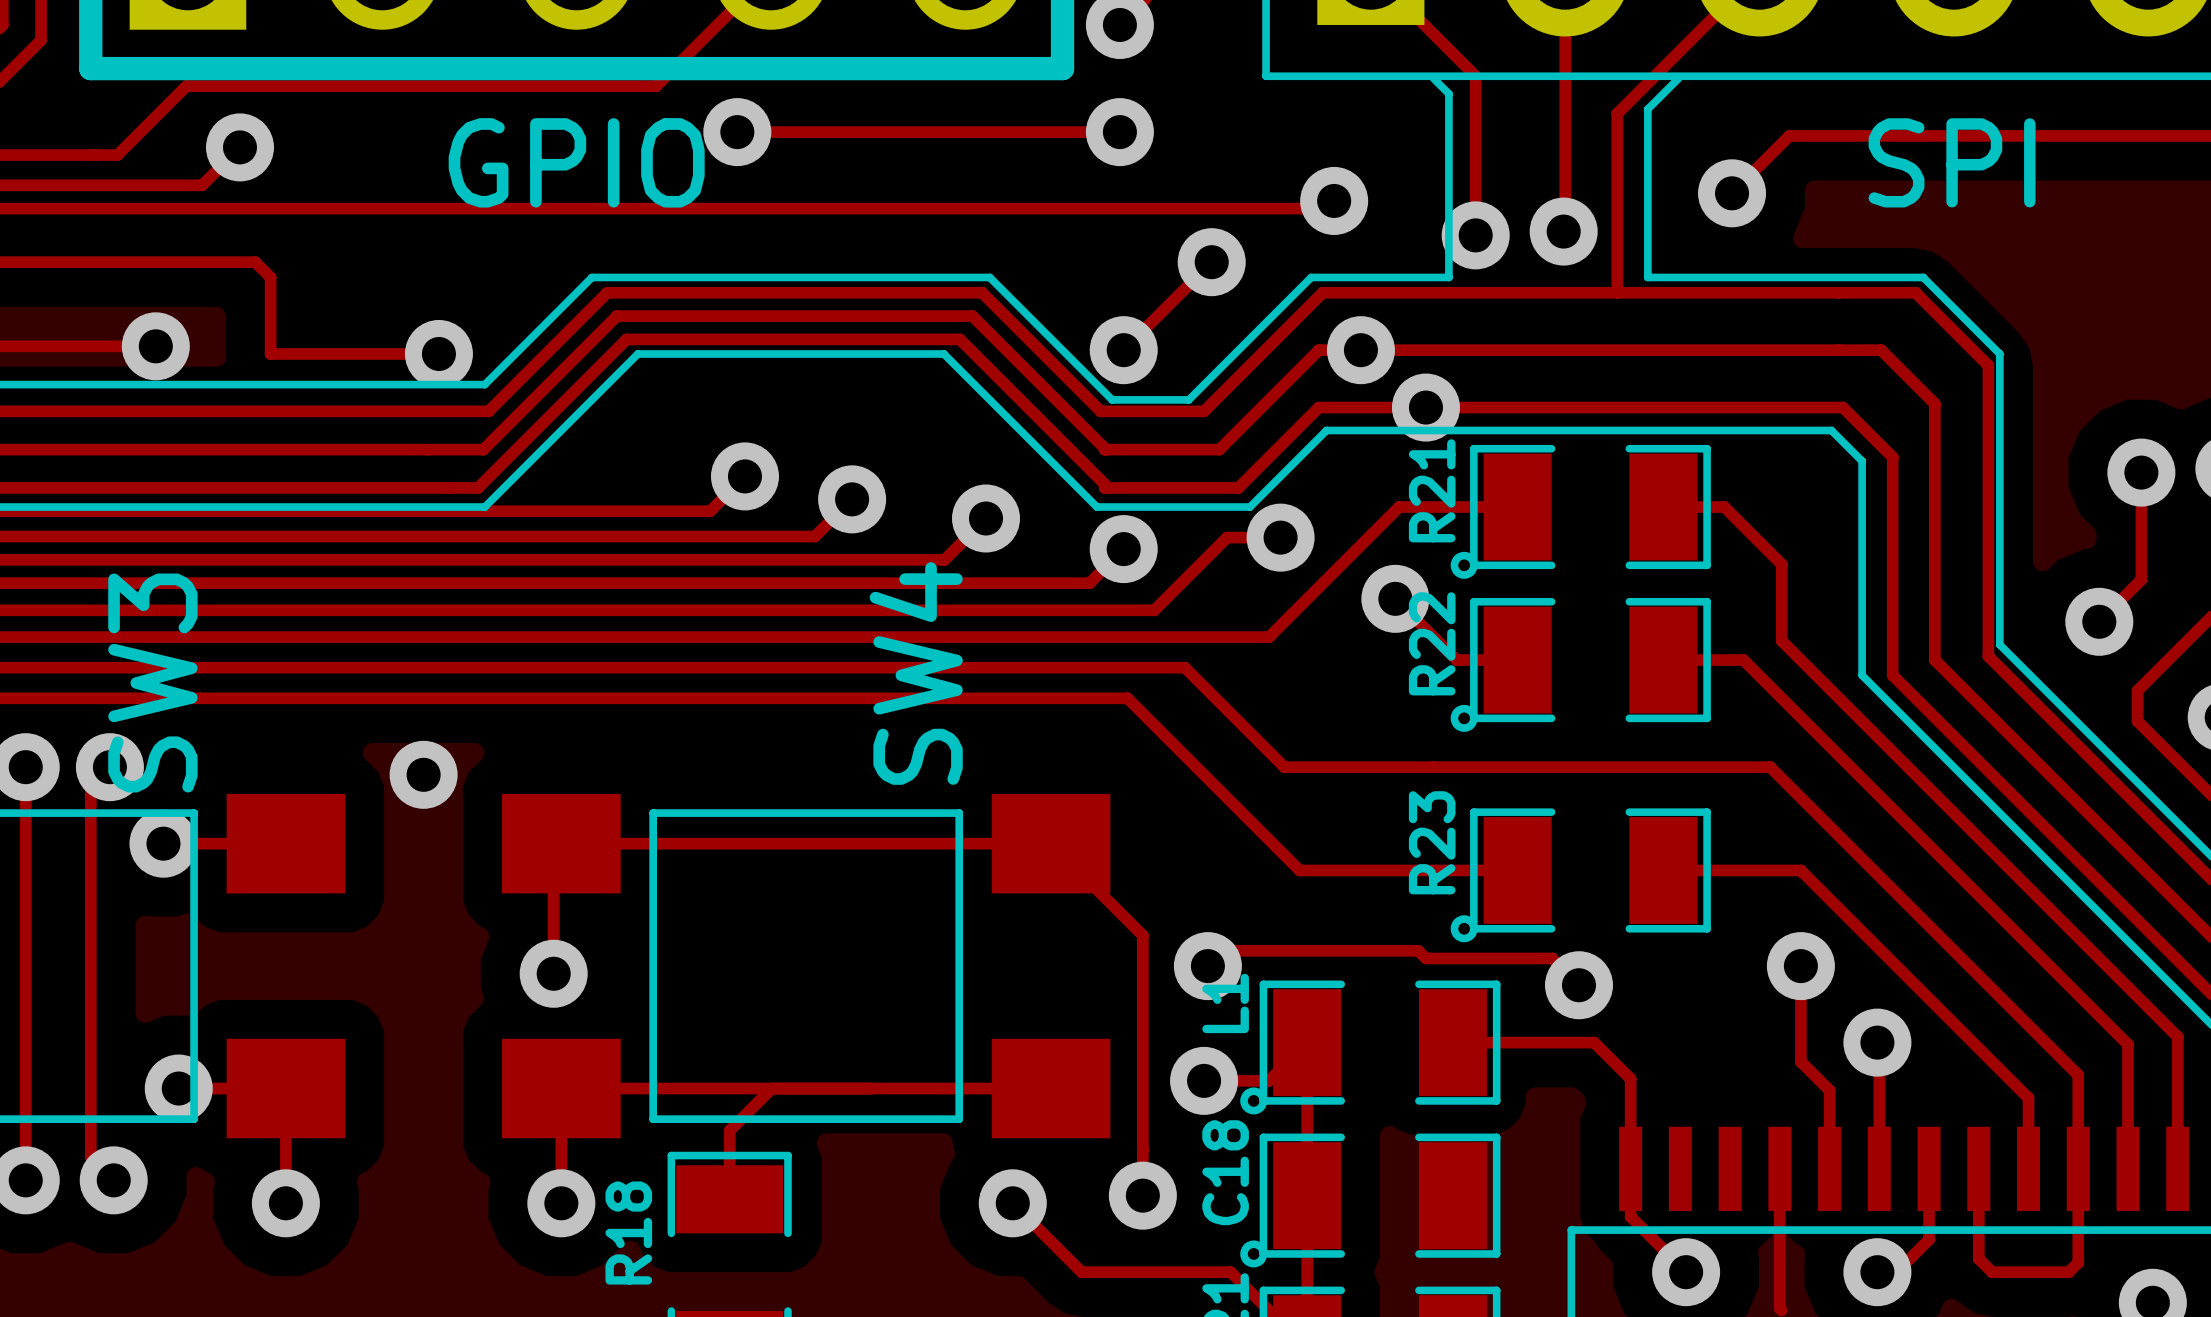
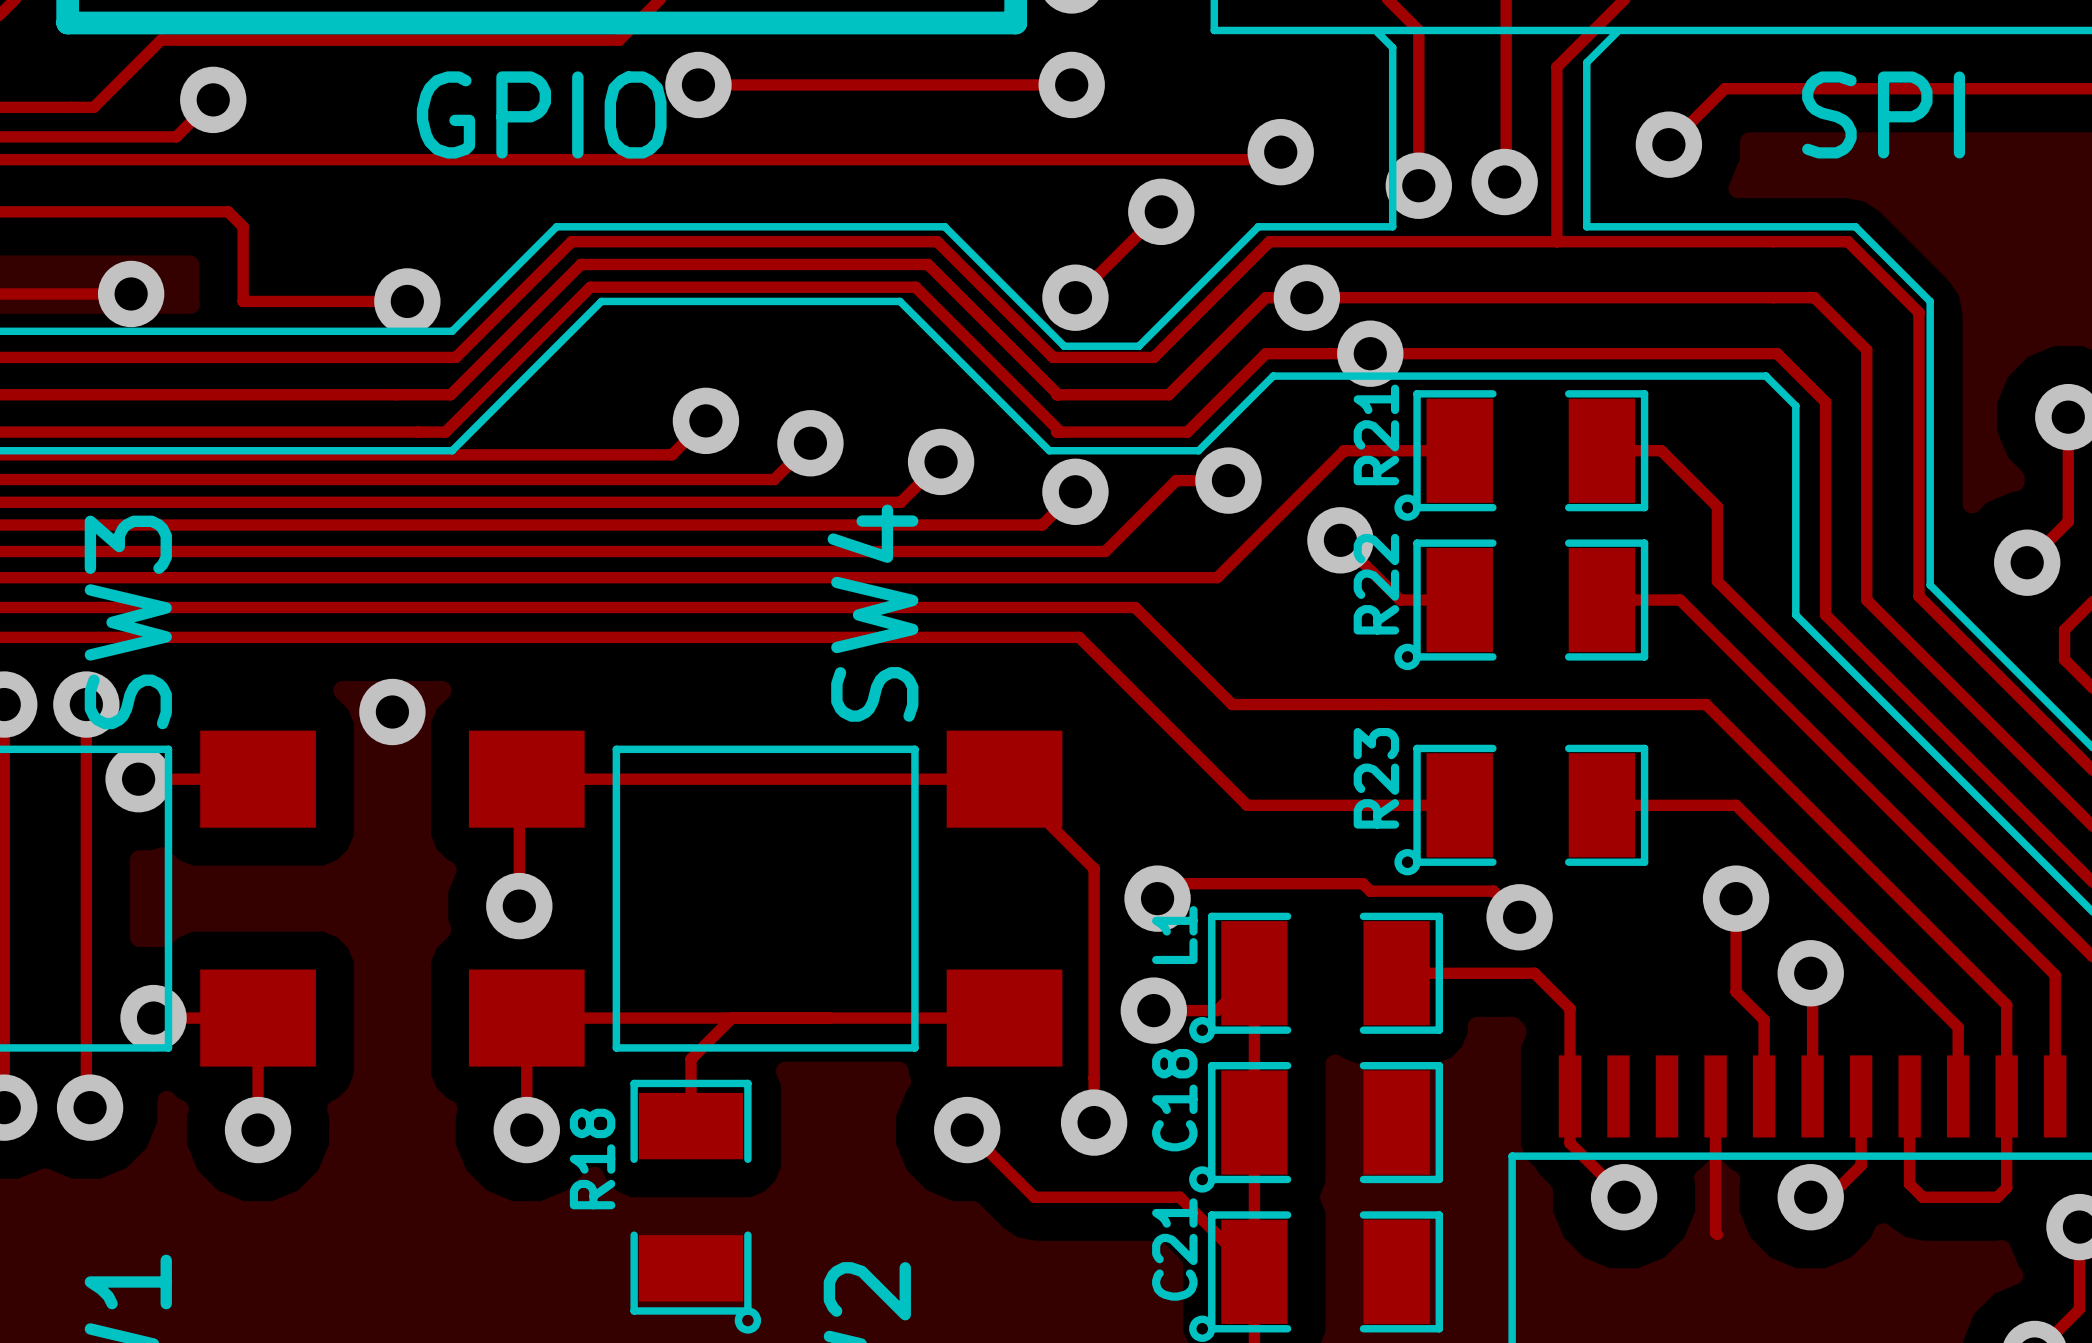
track: (109, 767) (90, 786) (90, 1157) (113, 1180) -> (86, 704) (86, 1107)

